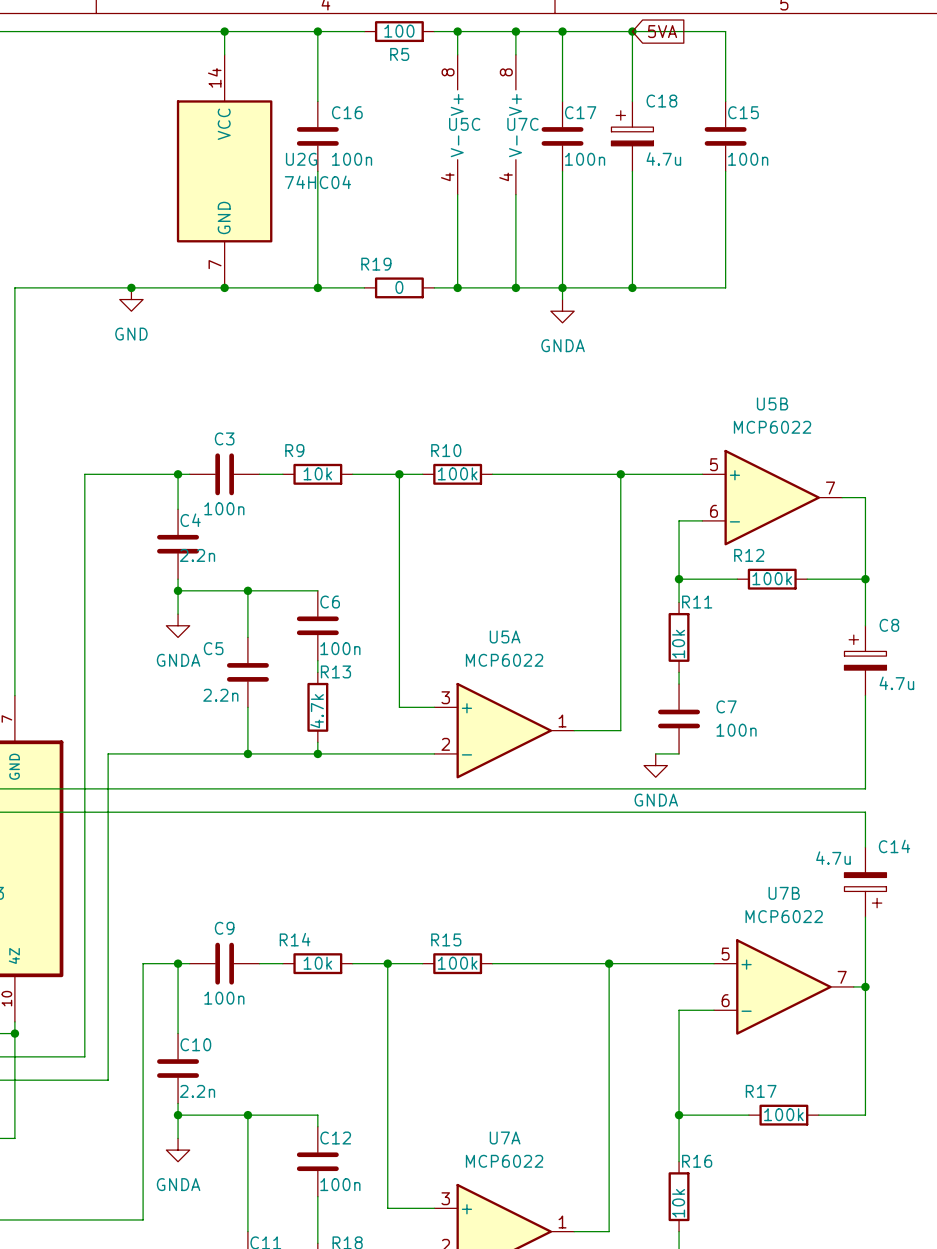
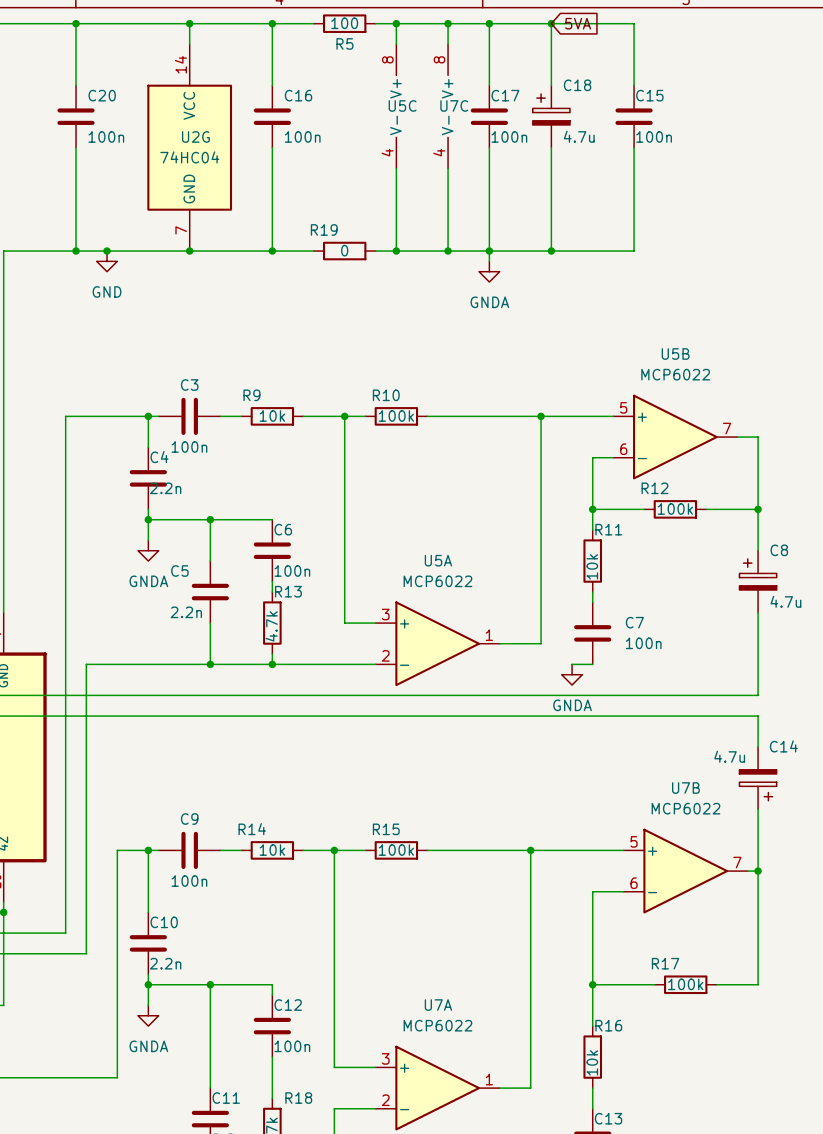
wire: none -> (76, 23) (76, 85)
junction: none -> (76, 23)
C20: none -> 100n (76, 116)
U2G name position: U2G (301, 159) -> U2G (195, 136)
wire: none -> (76, 147) (76, 251)
U2G value position: 74HC04 (317, 182) -> 74HC04 (189, 157)
junction: none -> (76, 251)

